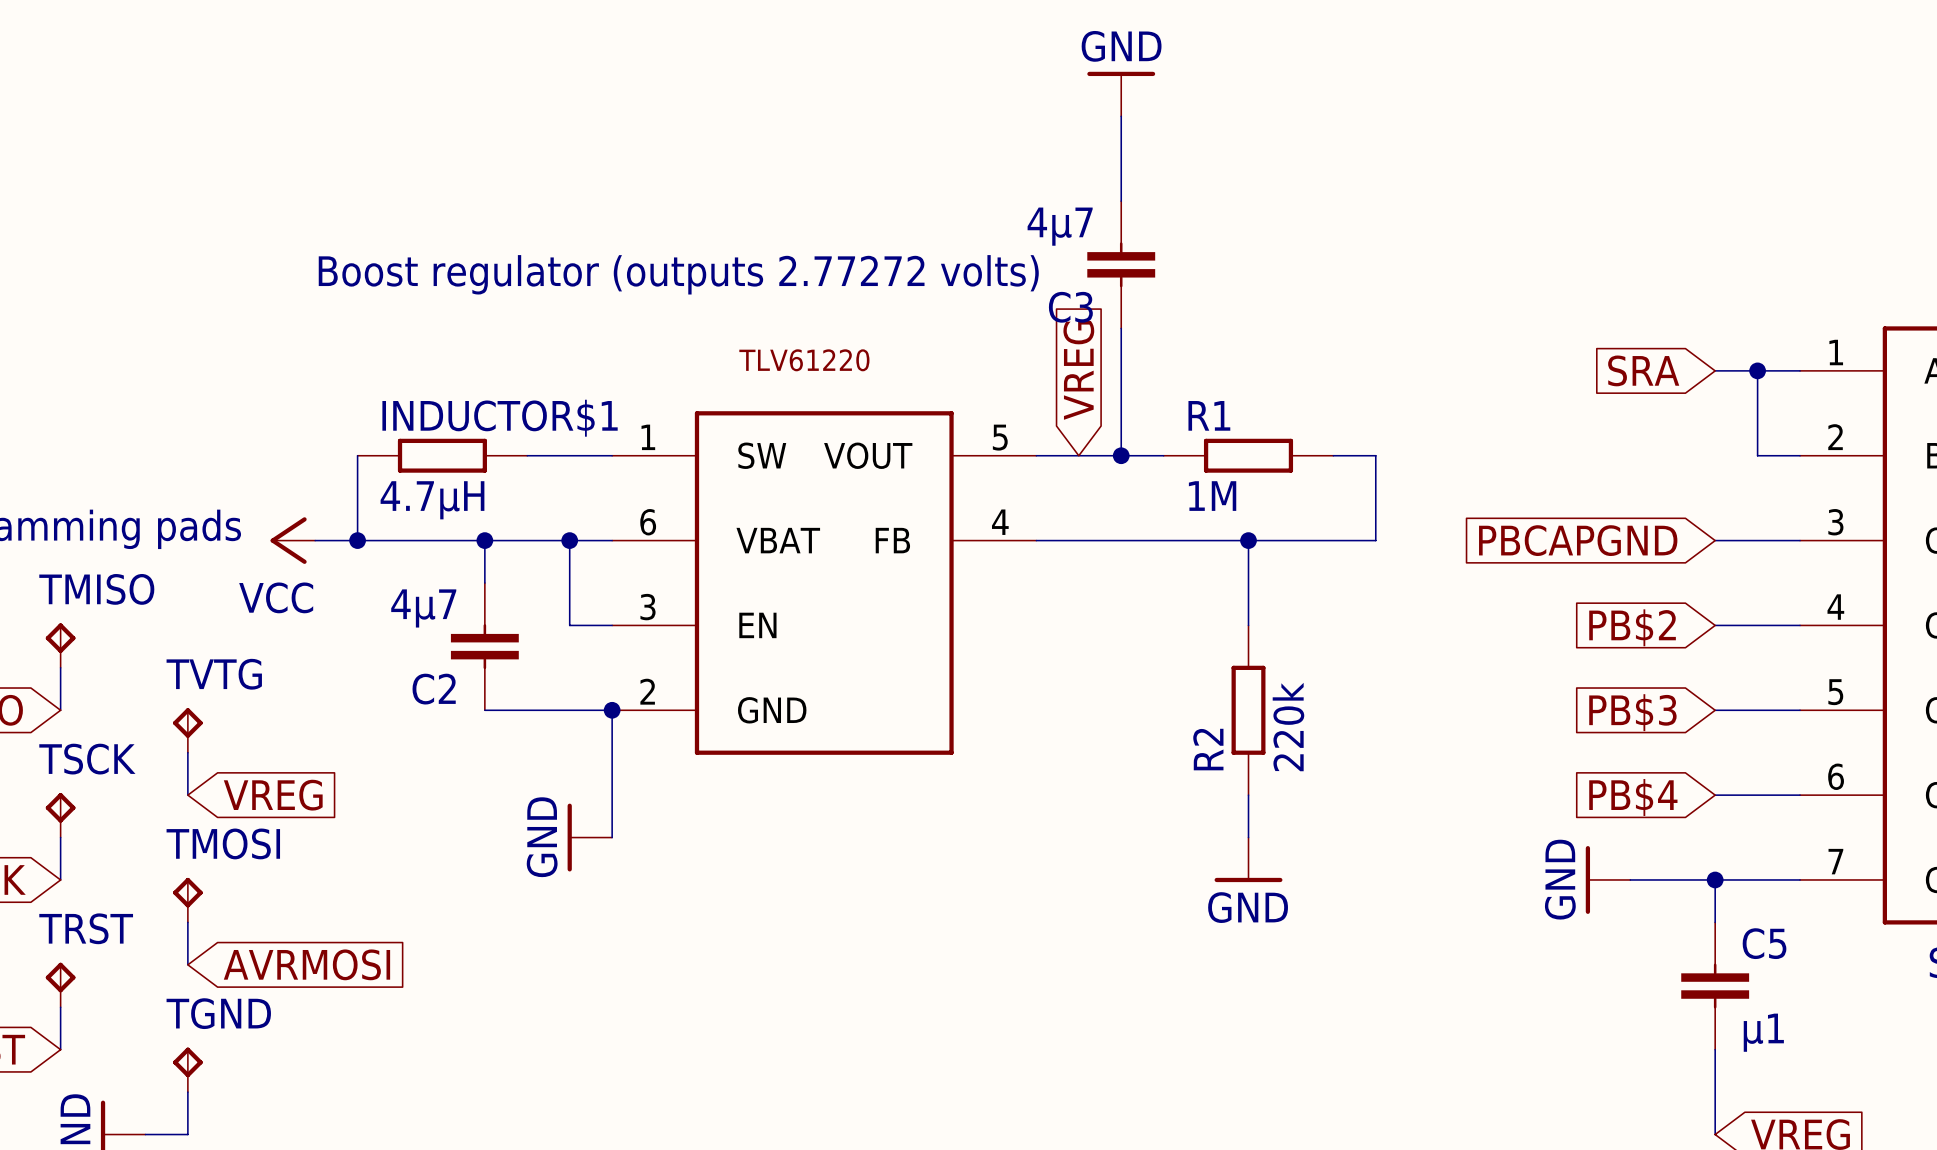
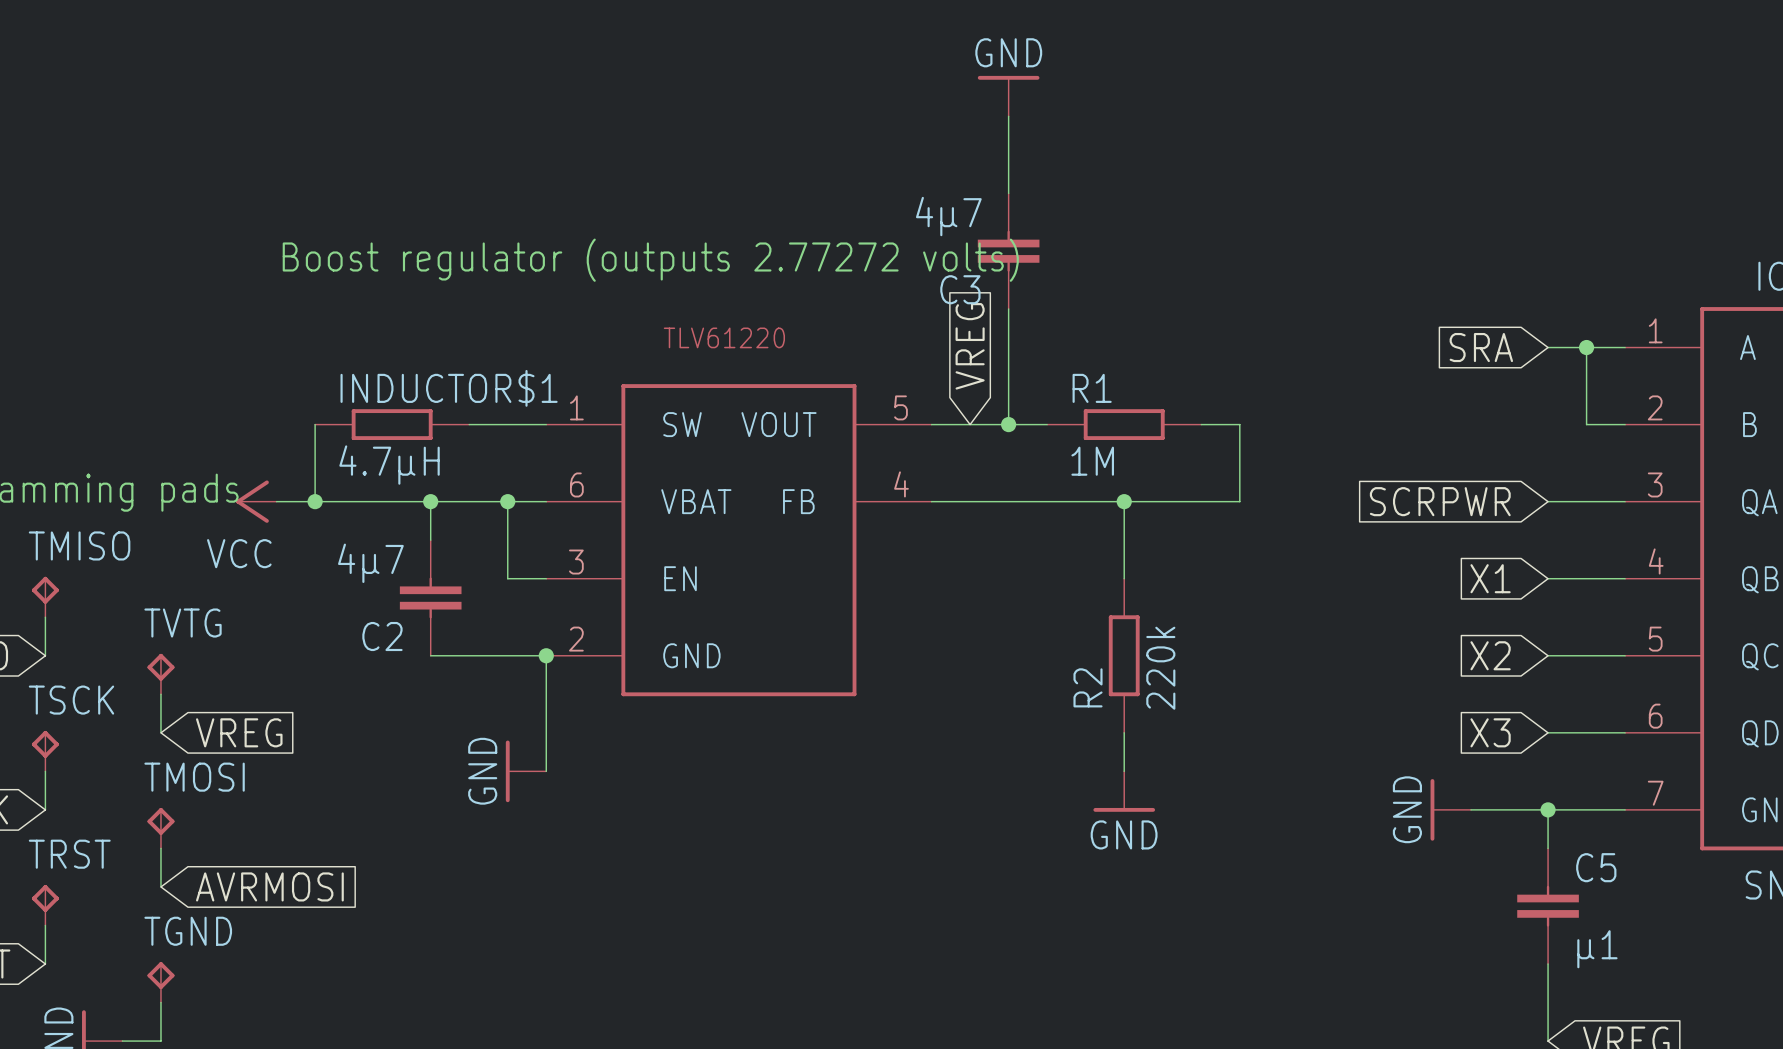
global label: PBCAPGND (1578, 540) -> SCRPWR (1440, 501)
global label: PB$2 (1632, 627) -> X1 (1490, 578)
global label: PB$3 (1632, 712) -> X2 (1490, 655)
global label: PB$4 (1633, 797) -> X3 (1490, 732)

